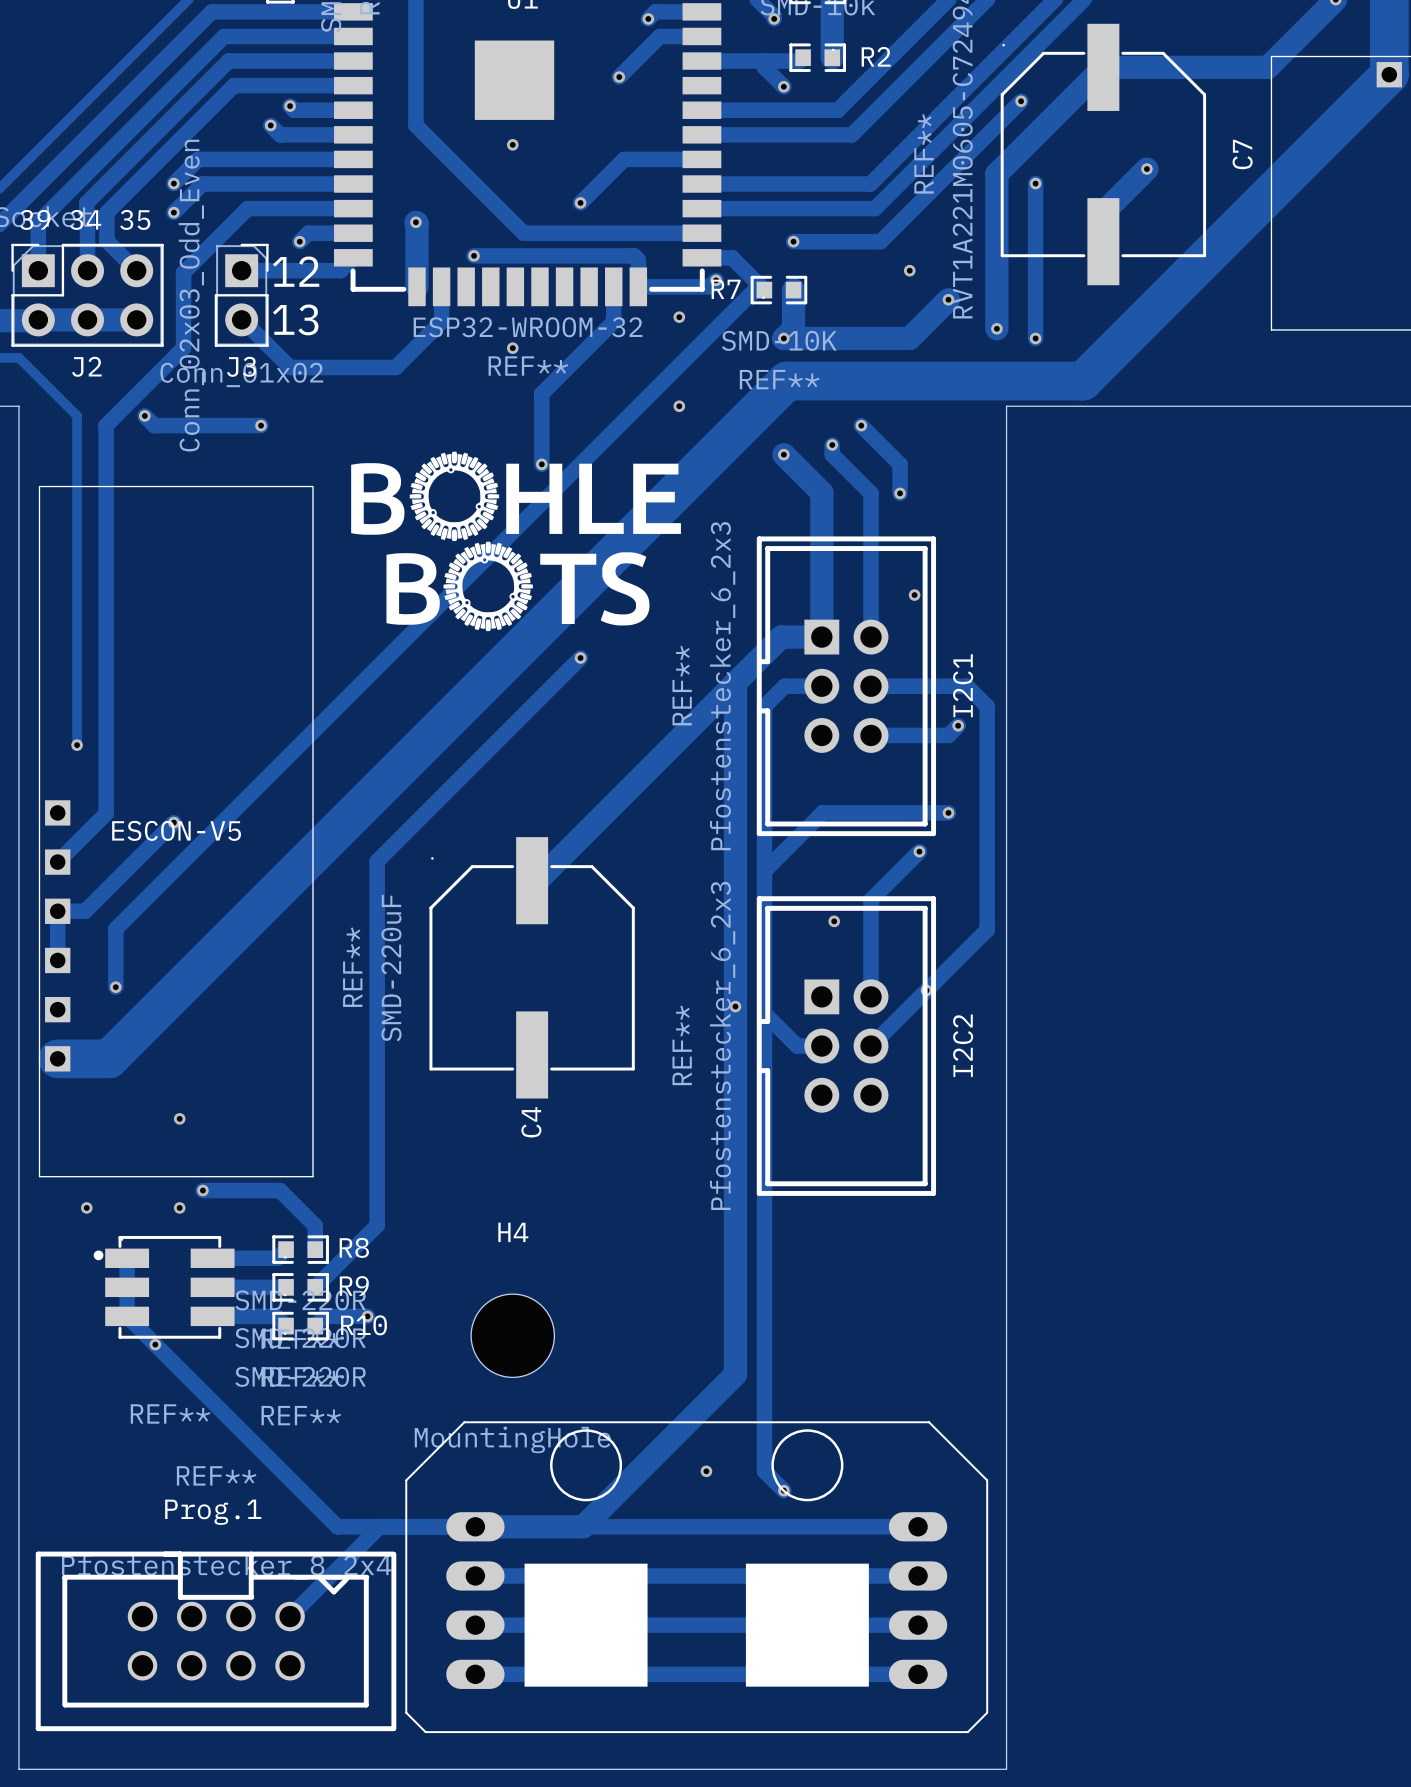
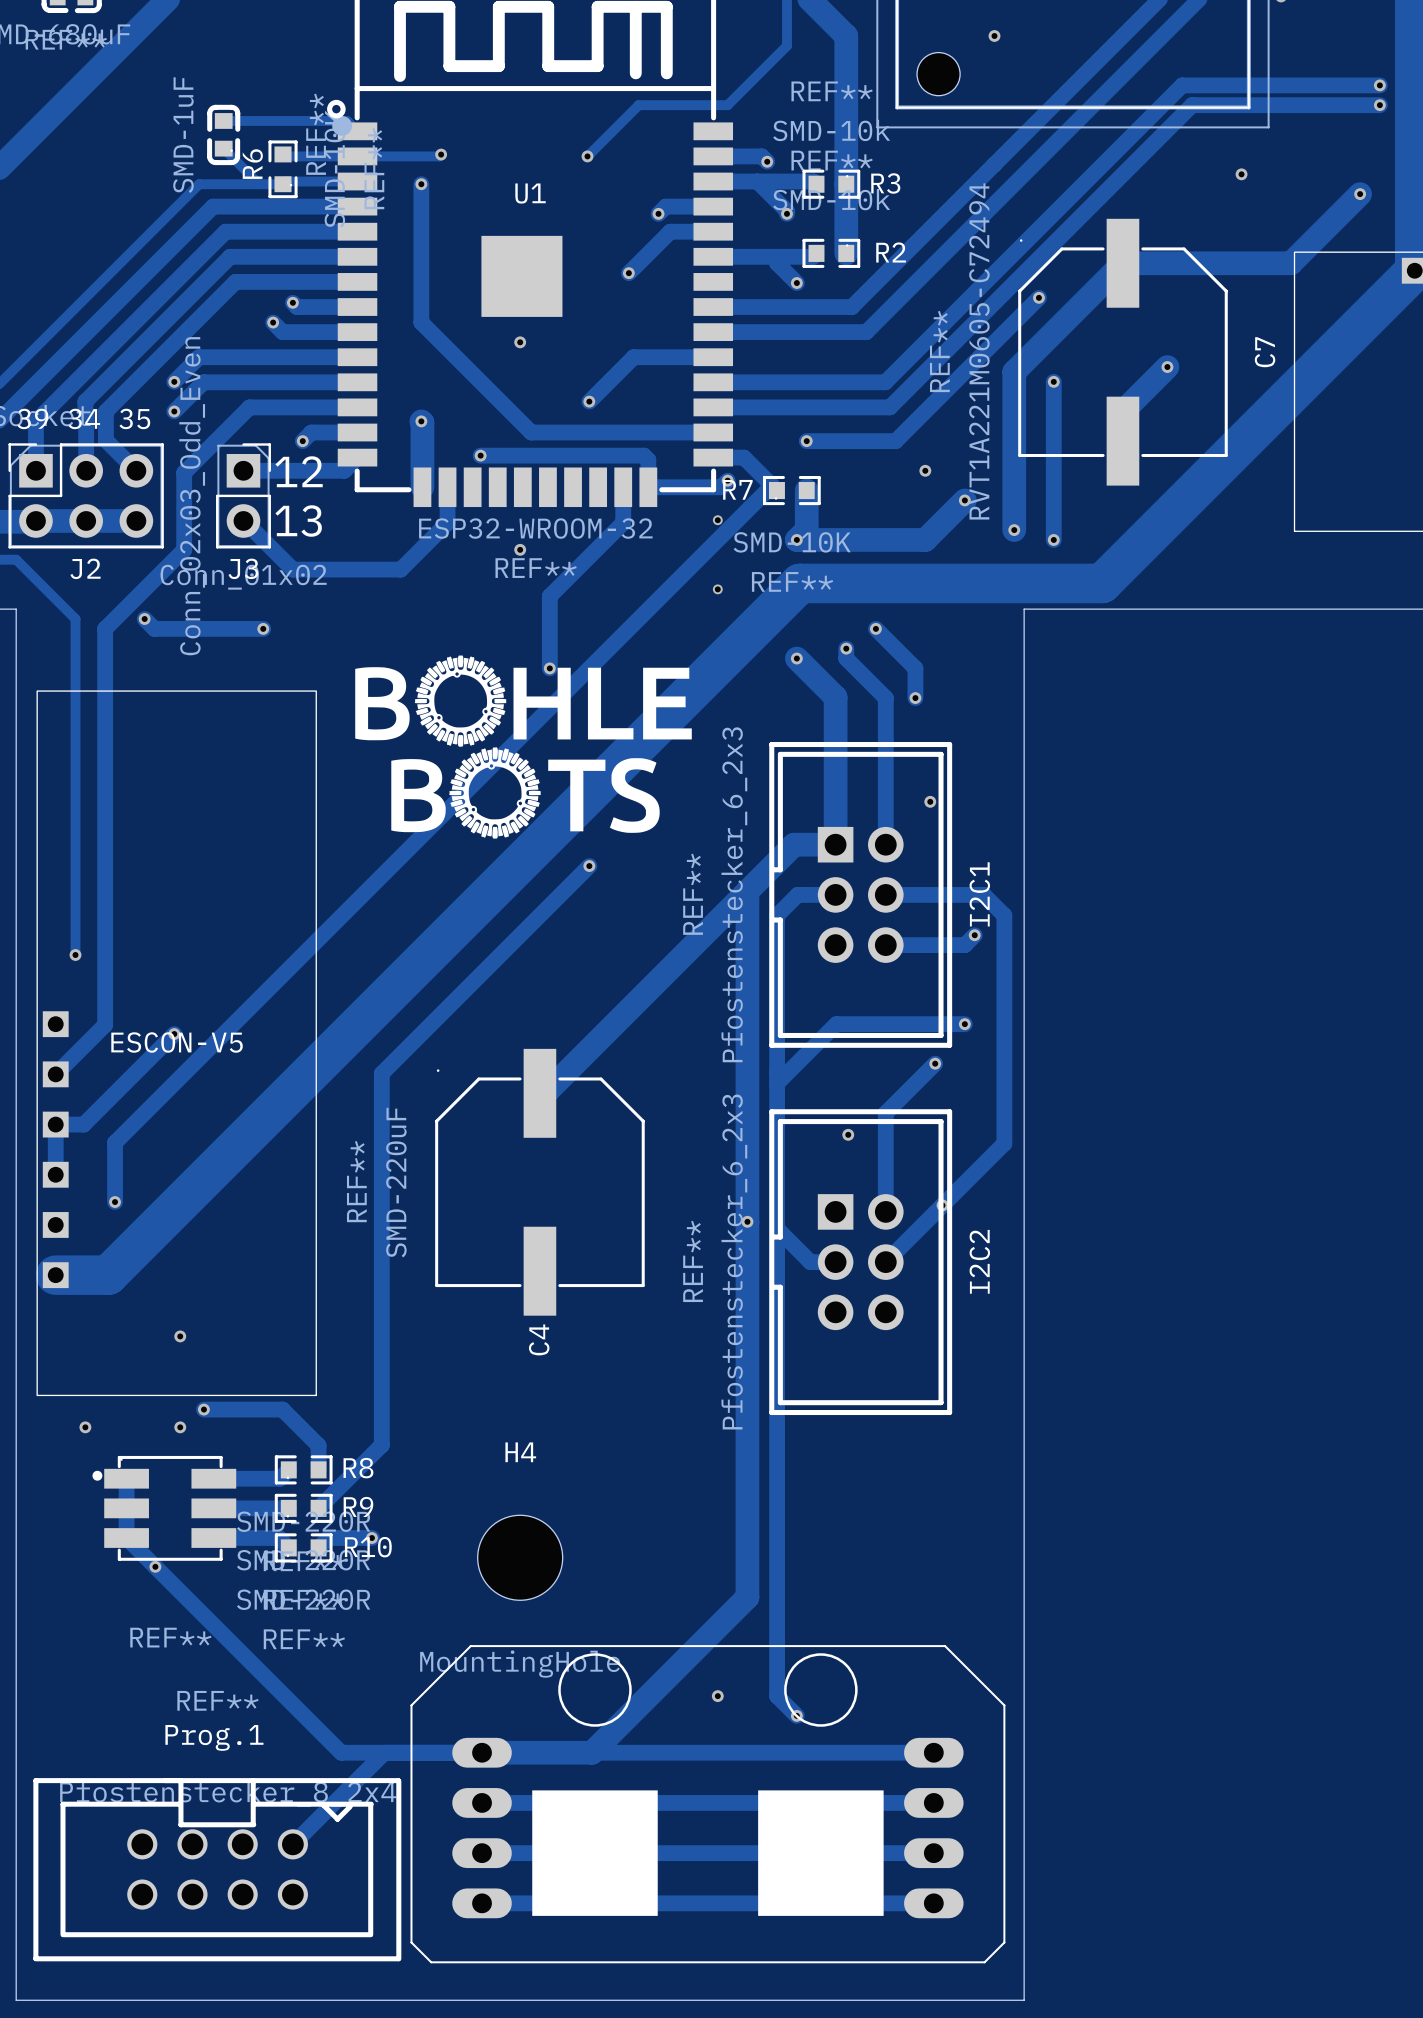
via: (679, 317) -> none
via: none -> (717, 520)
via: none -> (717, 589)
via: (679, 406) -> none

